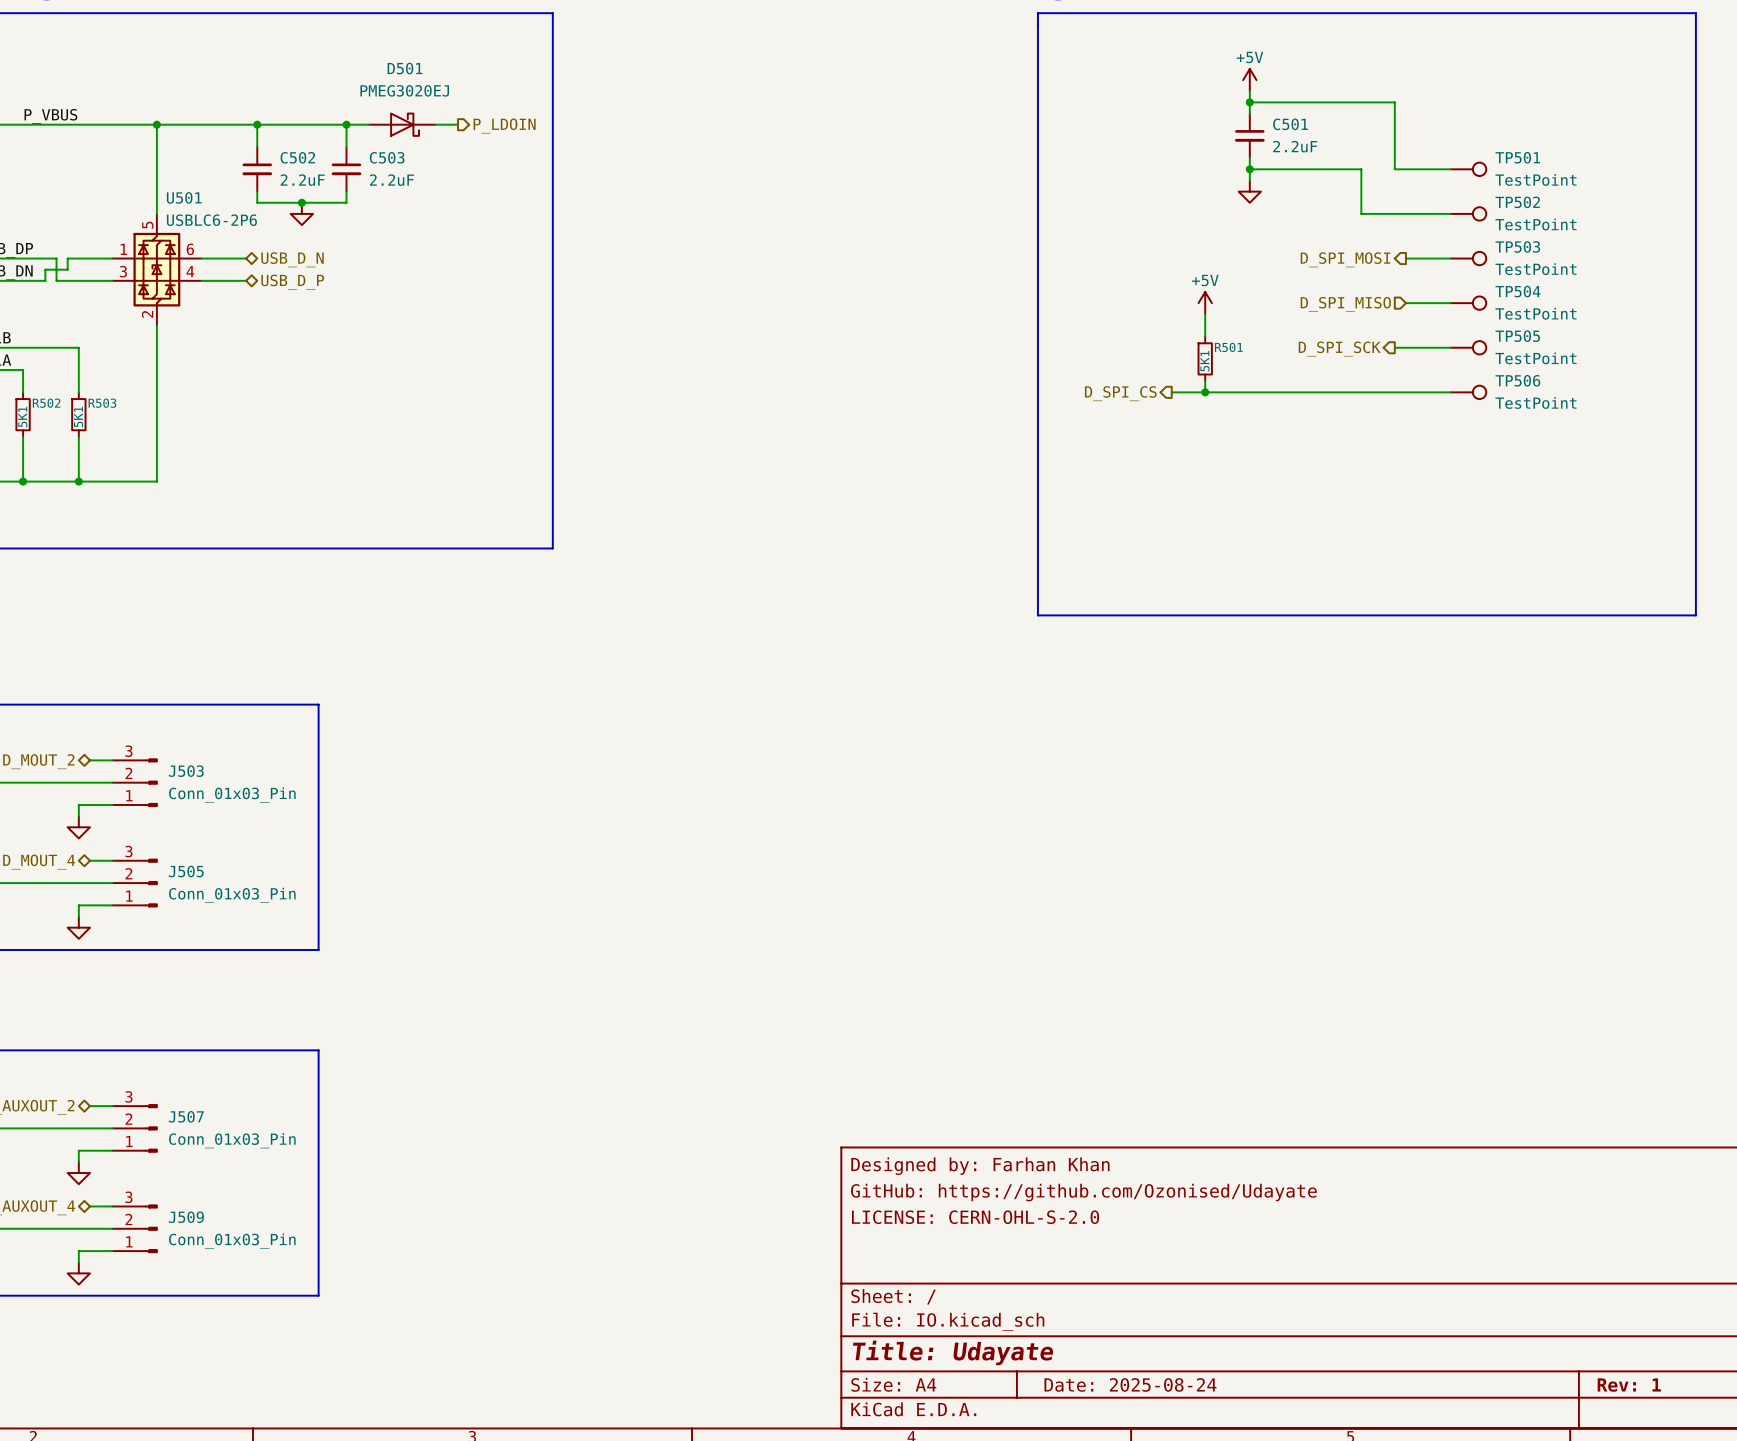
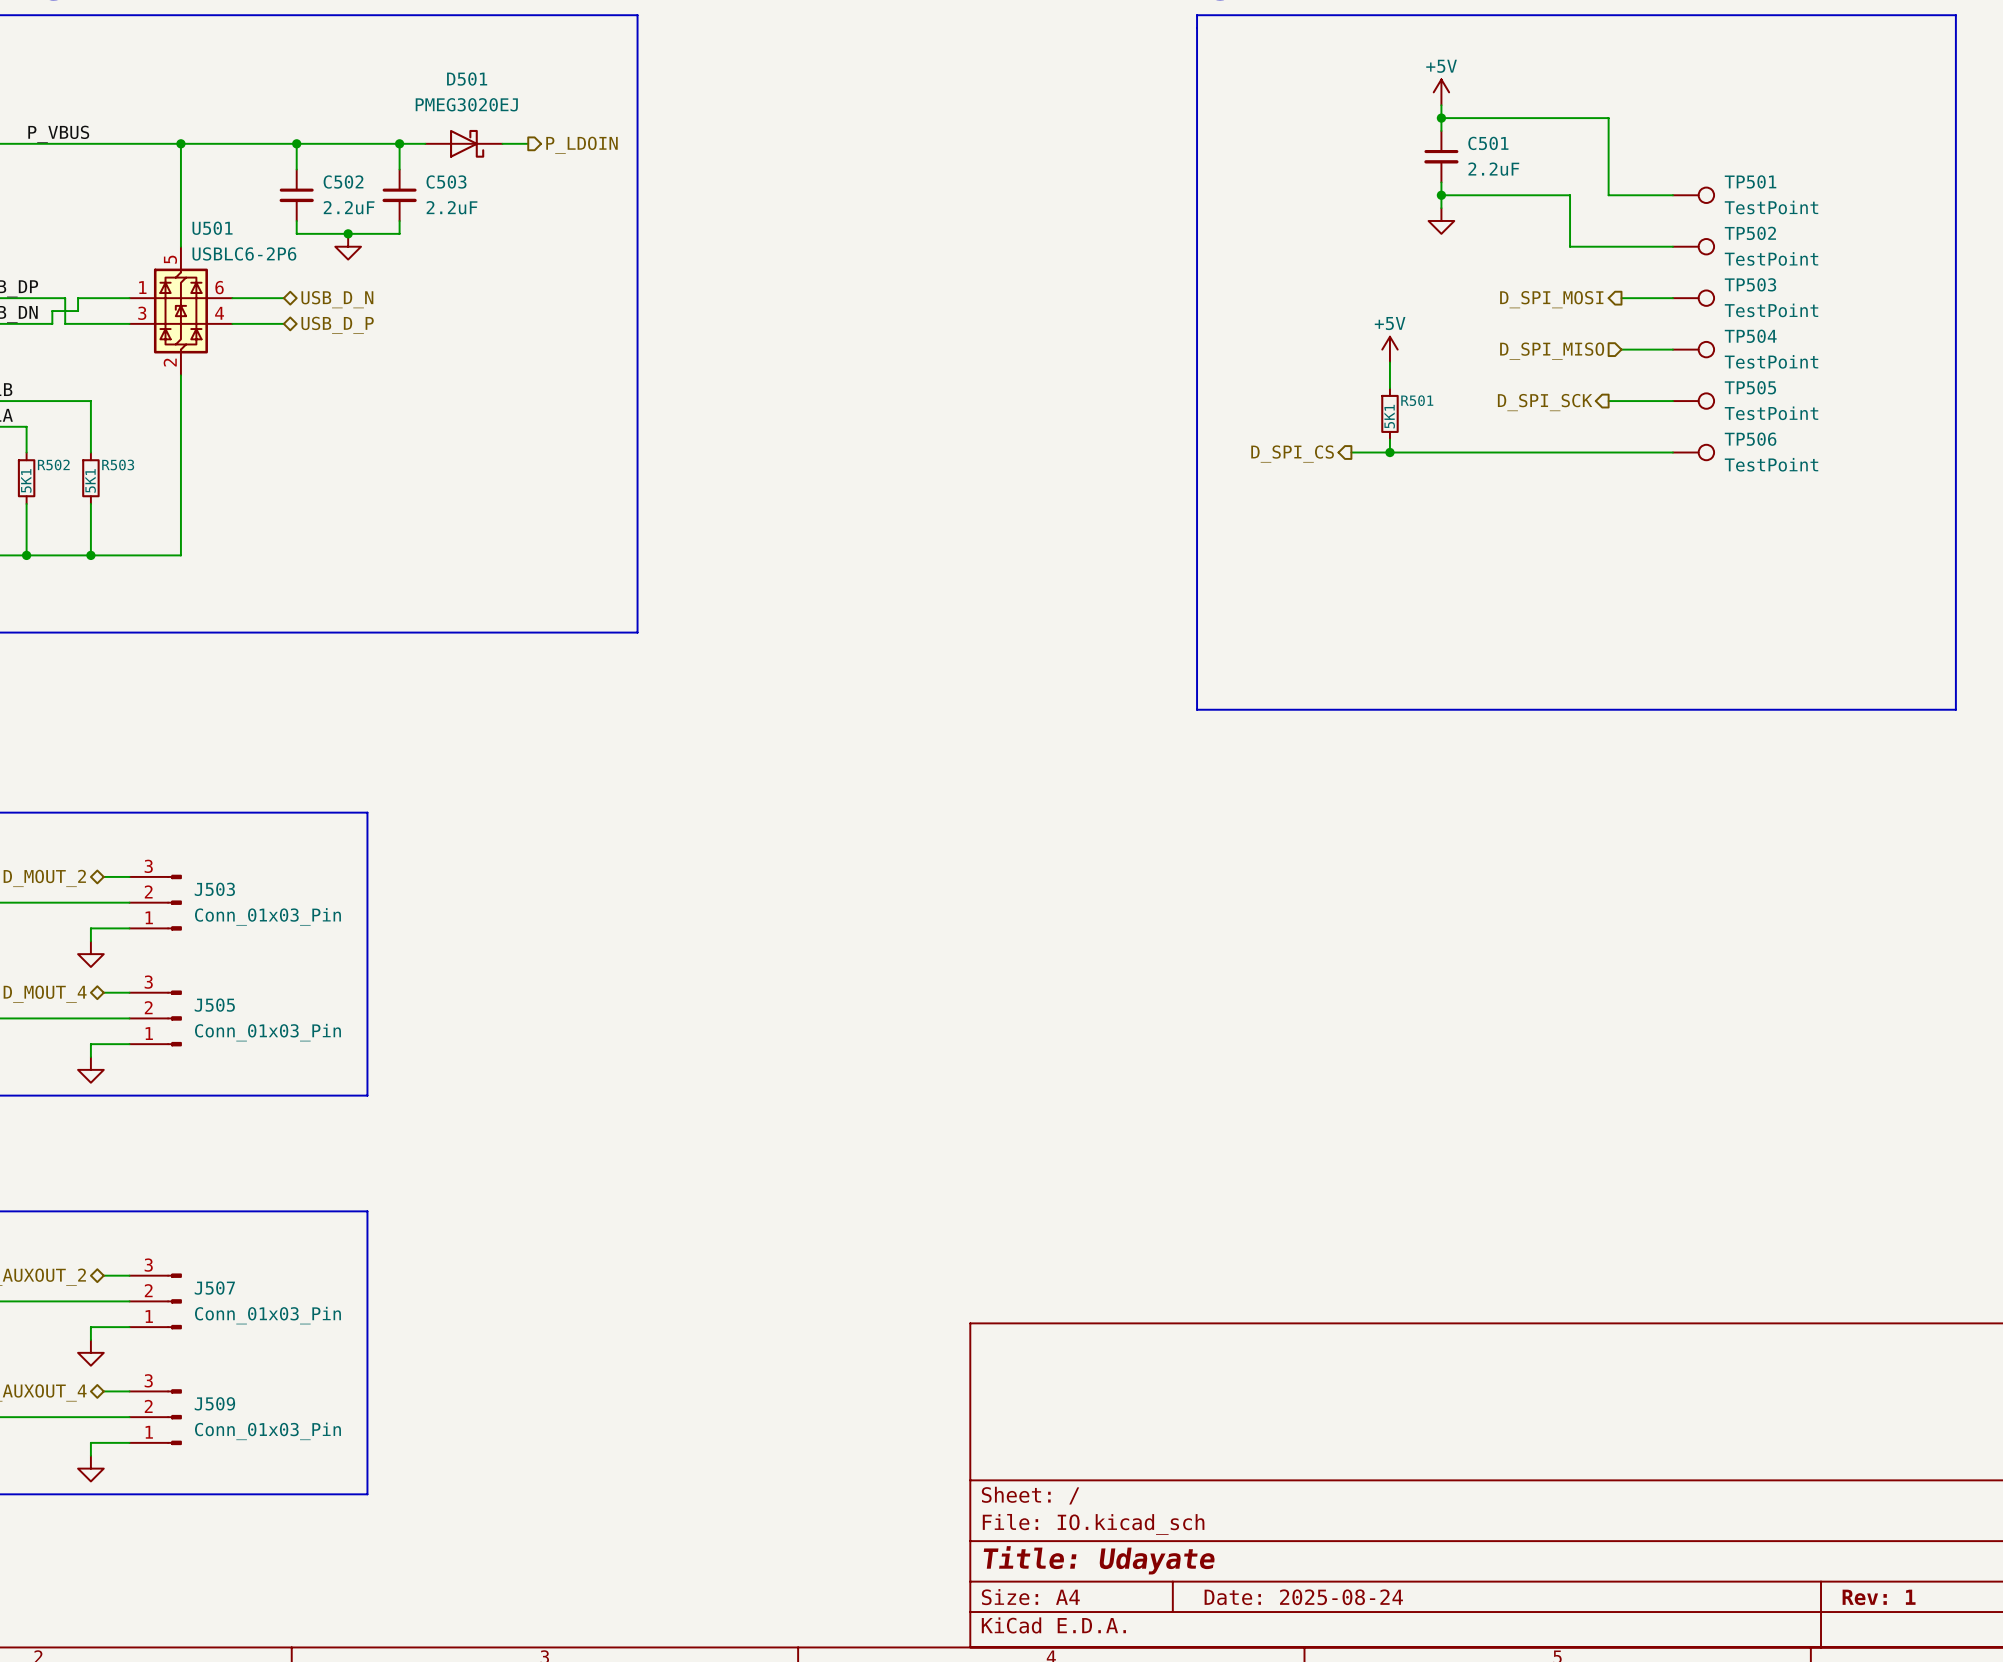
title block: Designed by: Farhan Khan (980, 1166) -> none
title block: GitHub: https://github.com/Ozonised/Udayate (1083, 1192) -> none
title block: LICENSE: CERN-OHL-S-2.0 (975, 1217) -> none

